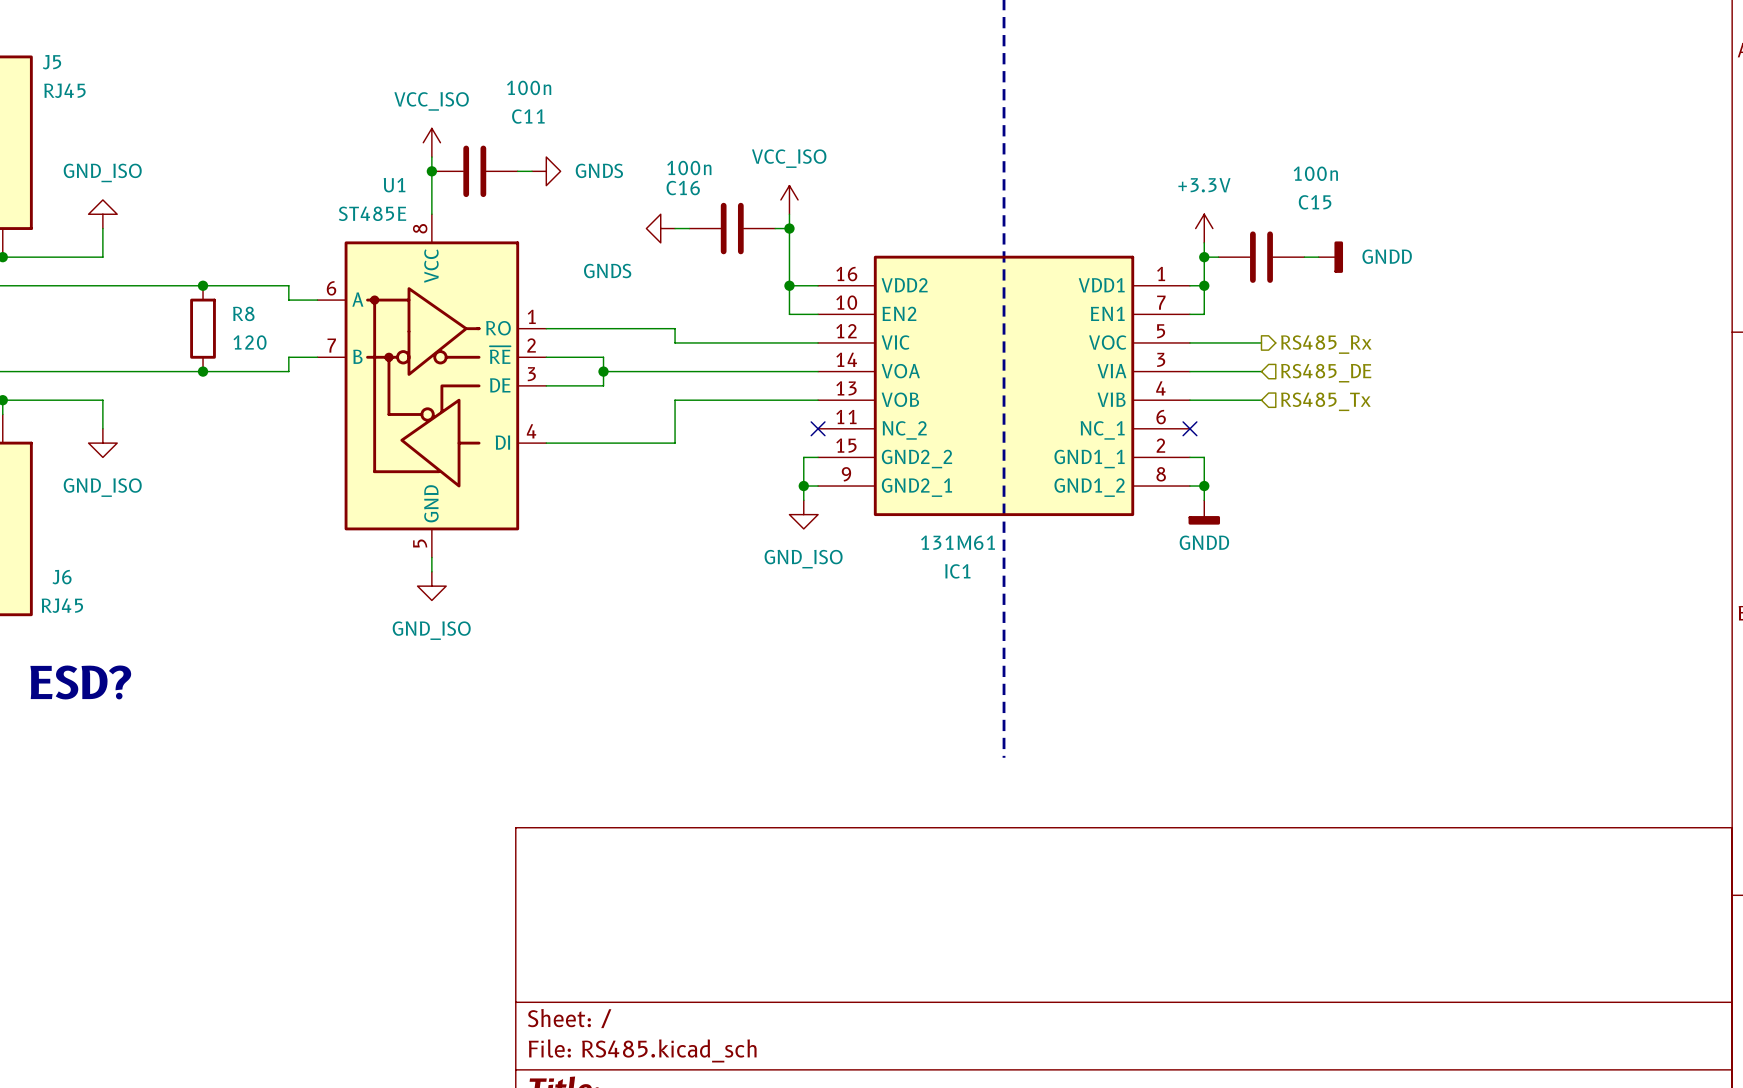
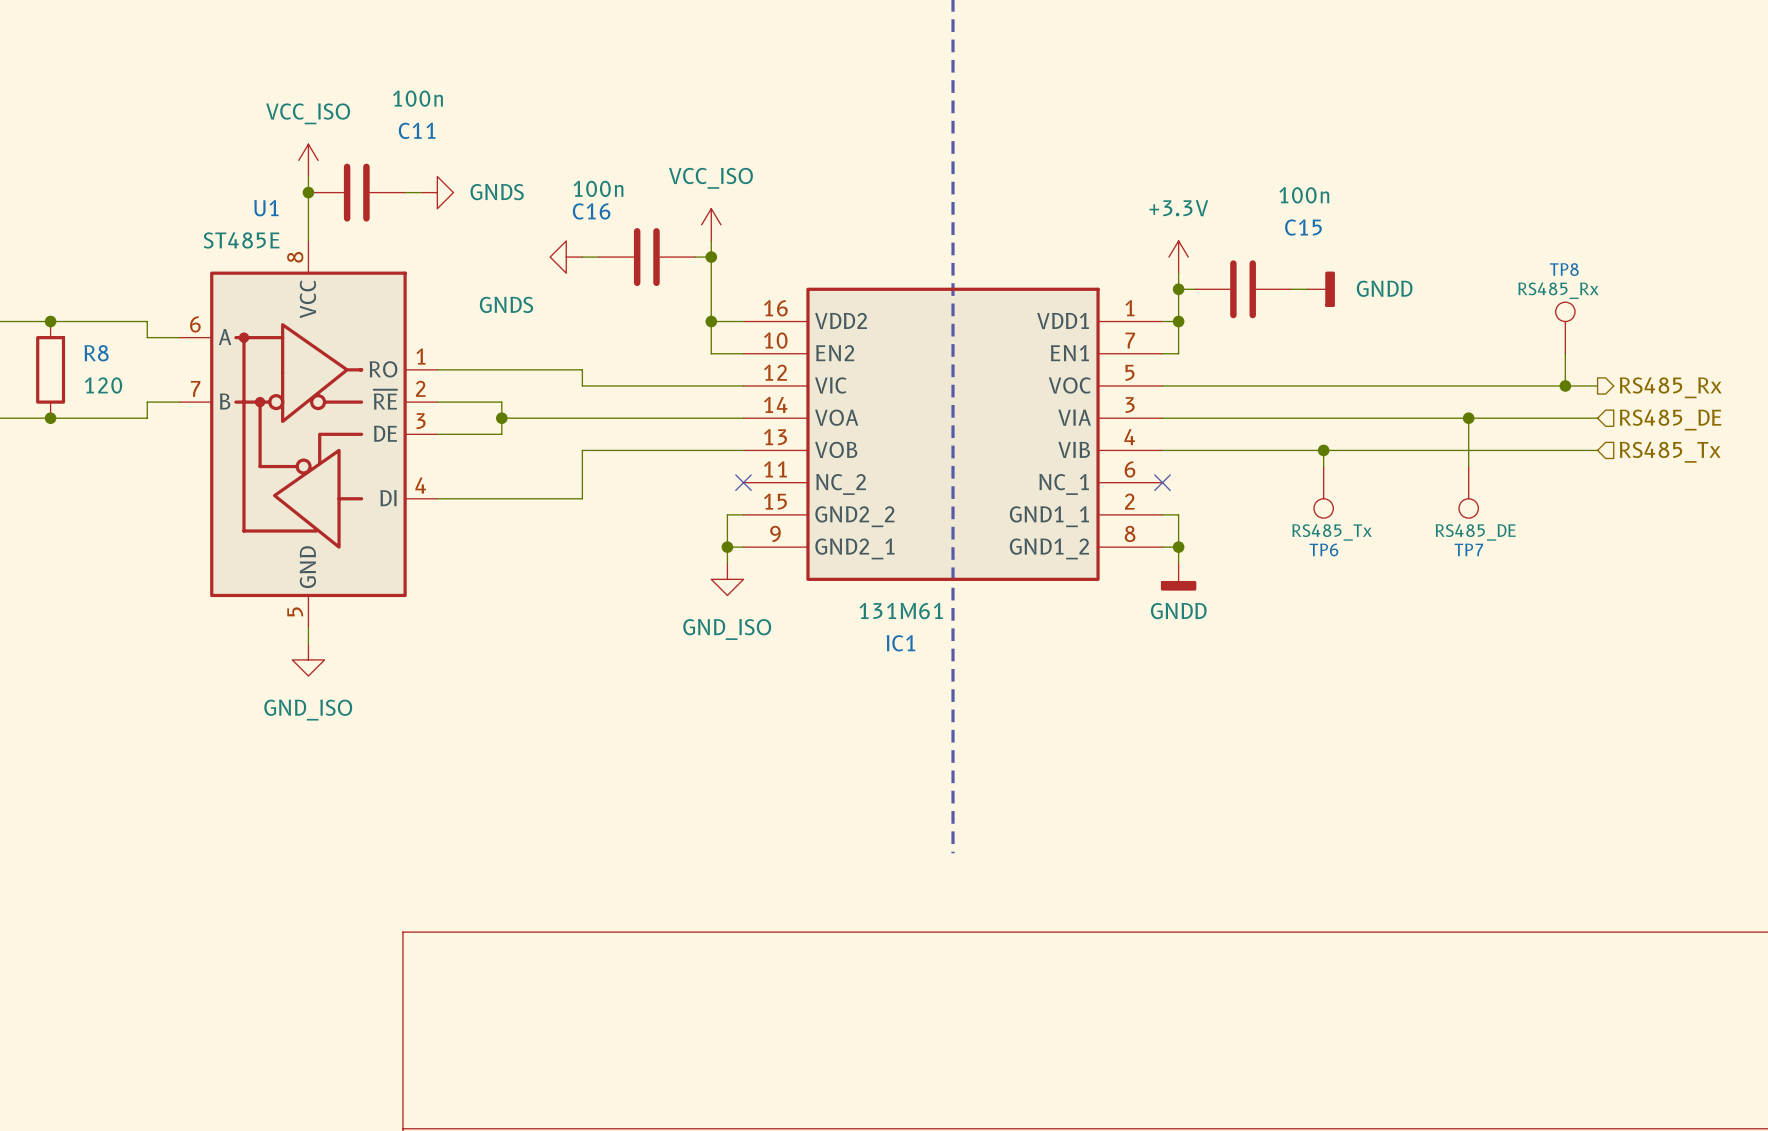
TP8: none -> RS485_Rx (1565, 327)
wire: none -> (1565, 353) (1565, 385)
wire: none -> (1243, 385) (1597, 385)
junction: none -> (1565, 385)
hierarchical label: RS485_Rx (1326, 344) -> none
hierarchical label: none -> RS485_Rx (1670, 387)
wire: none -> (1243, 418) (1597, 418)
wire: none -> (1468, 418) (1468, 466)
junction: none -> (1468, 418)
hierarchical label: RS485_DE (1326, 373) -> none
hierarchical label: none -> RS485_DE (1670, 420)
wire: none -> (1243, 450) (1597, 450)
wire: none -> (1323, 450) (1323, 466)
junction: none -> (1323, 450)
hierarchical label: RS485_Tx (1325, 401) -> none
hierarchical label: none -> RS485_Tx (1670, 452)
TP6: none -> RS485_Tx (1323, 492)
TP7: none -> RS485_DE (1468, 492)

